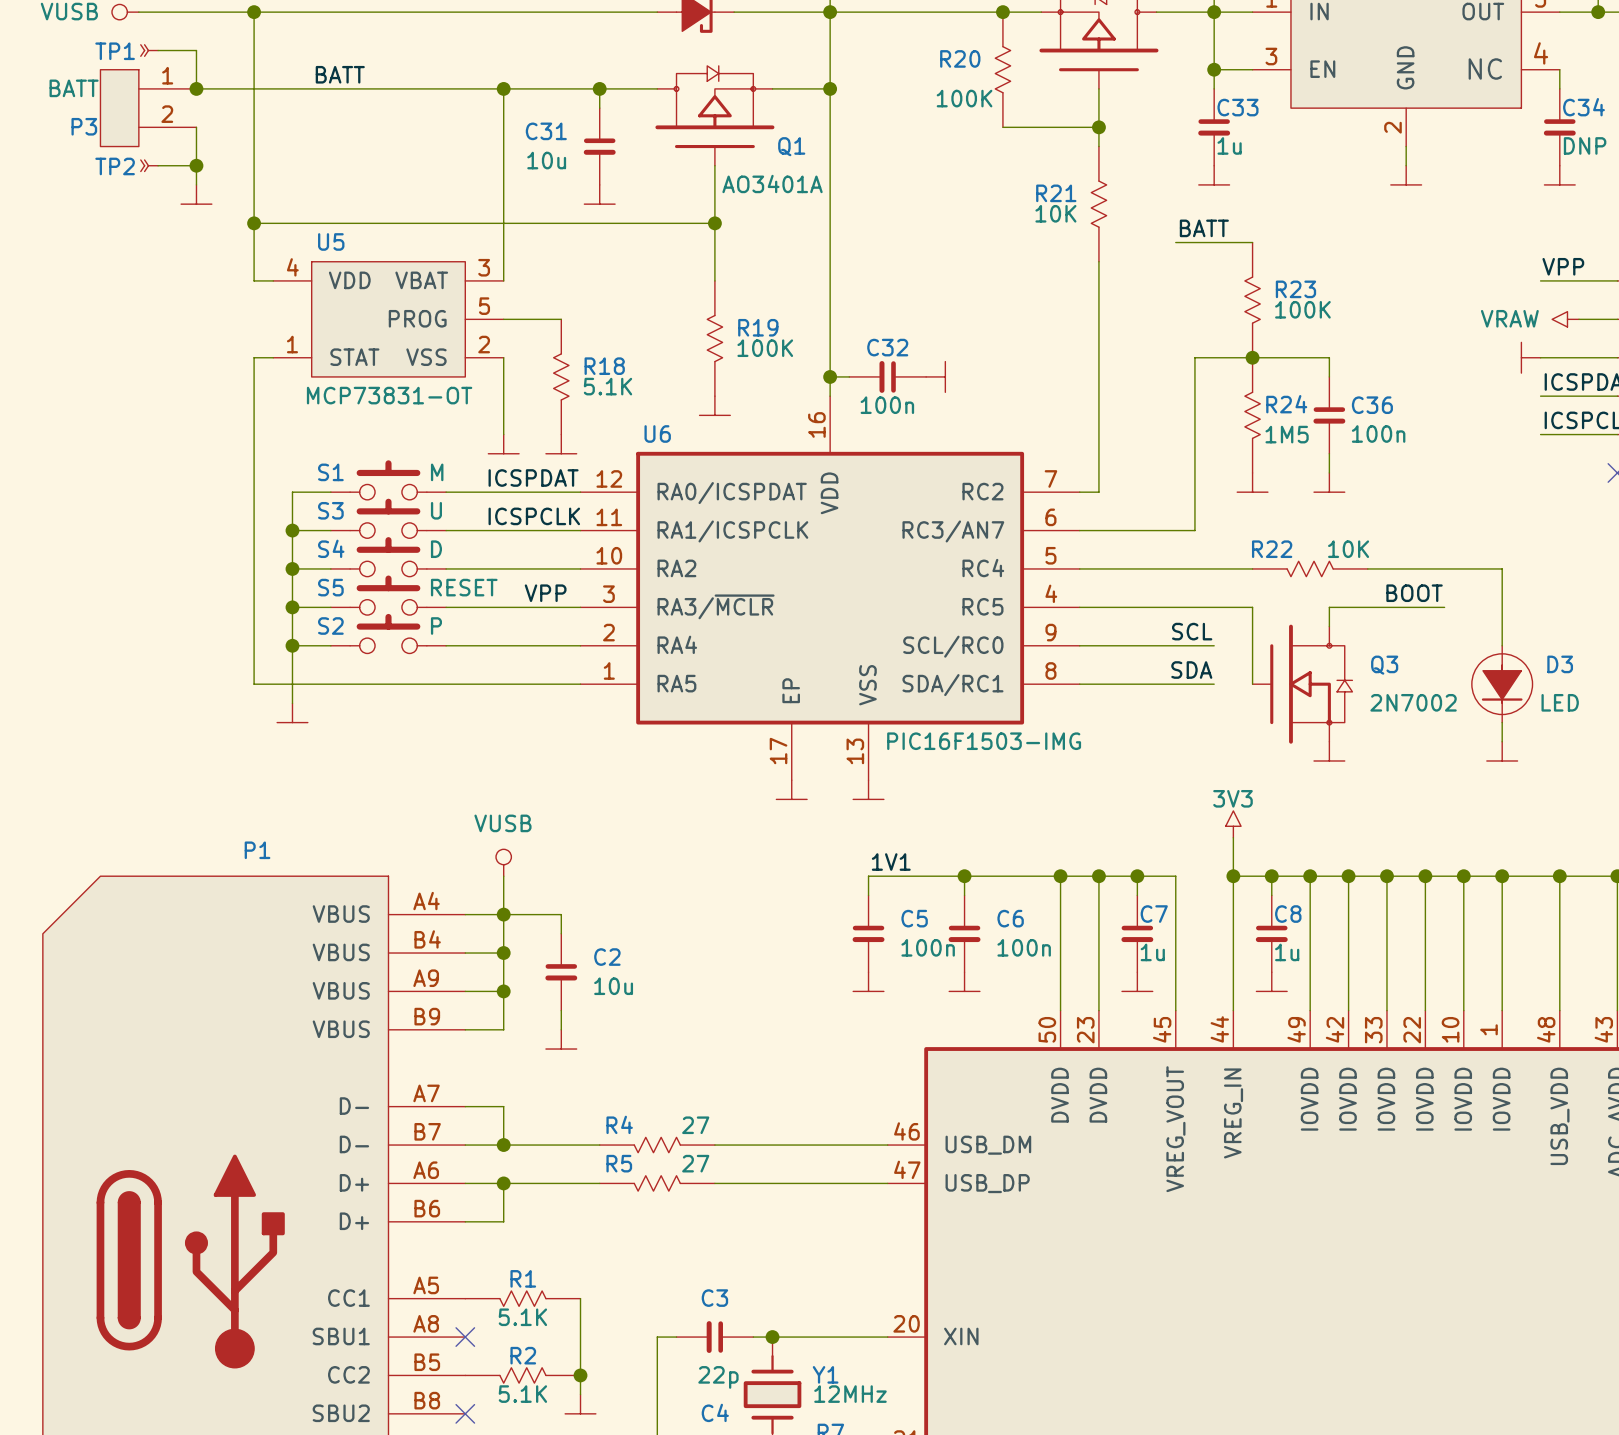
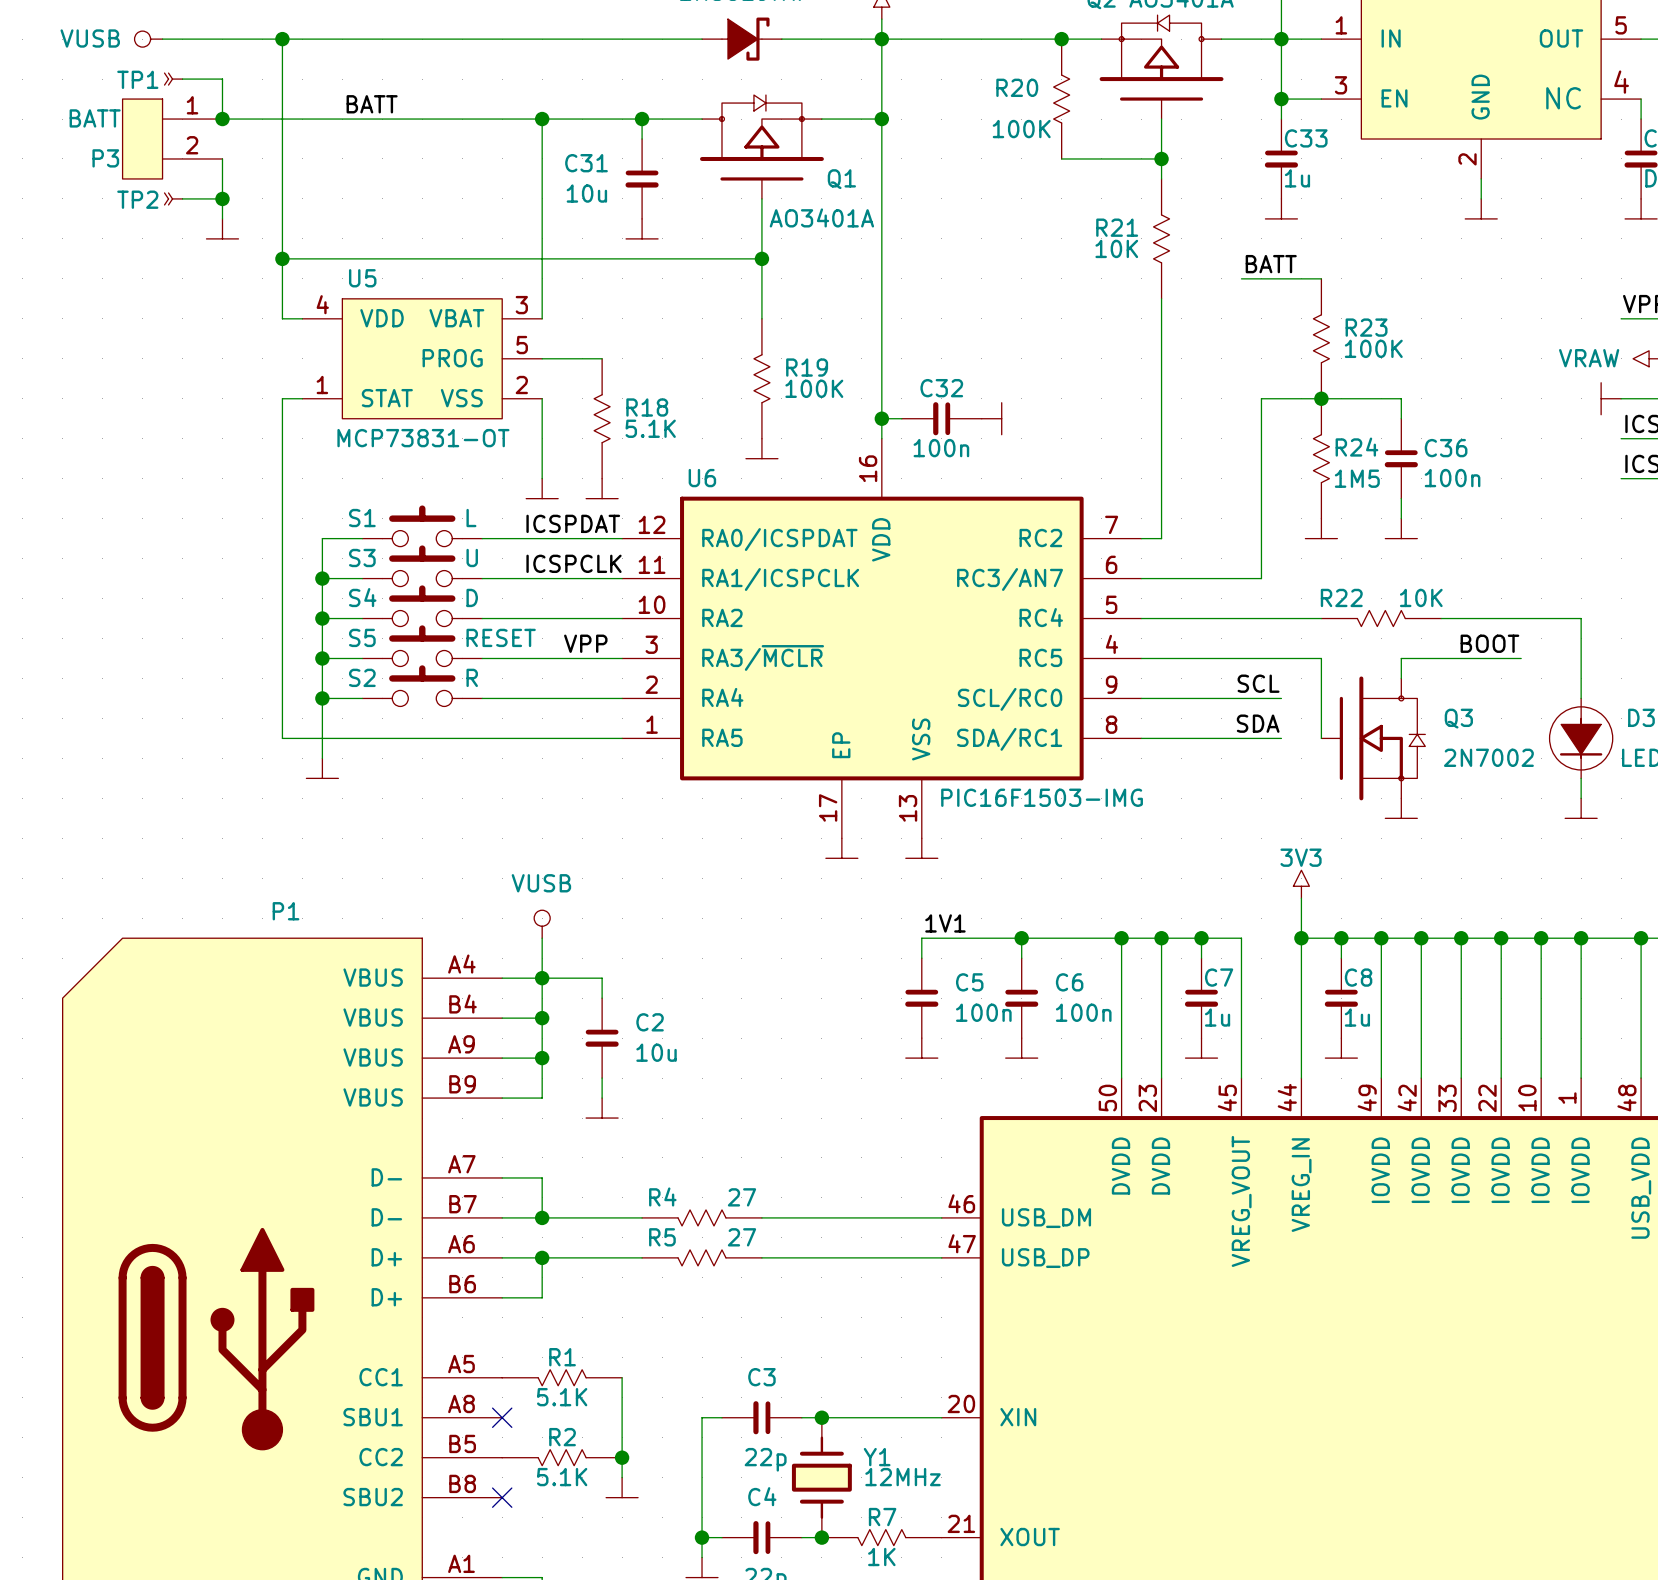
S1 value: M (437, 472) -> L (471, 518)
S2 value: P (436, 626) -> R (472, 677)

